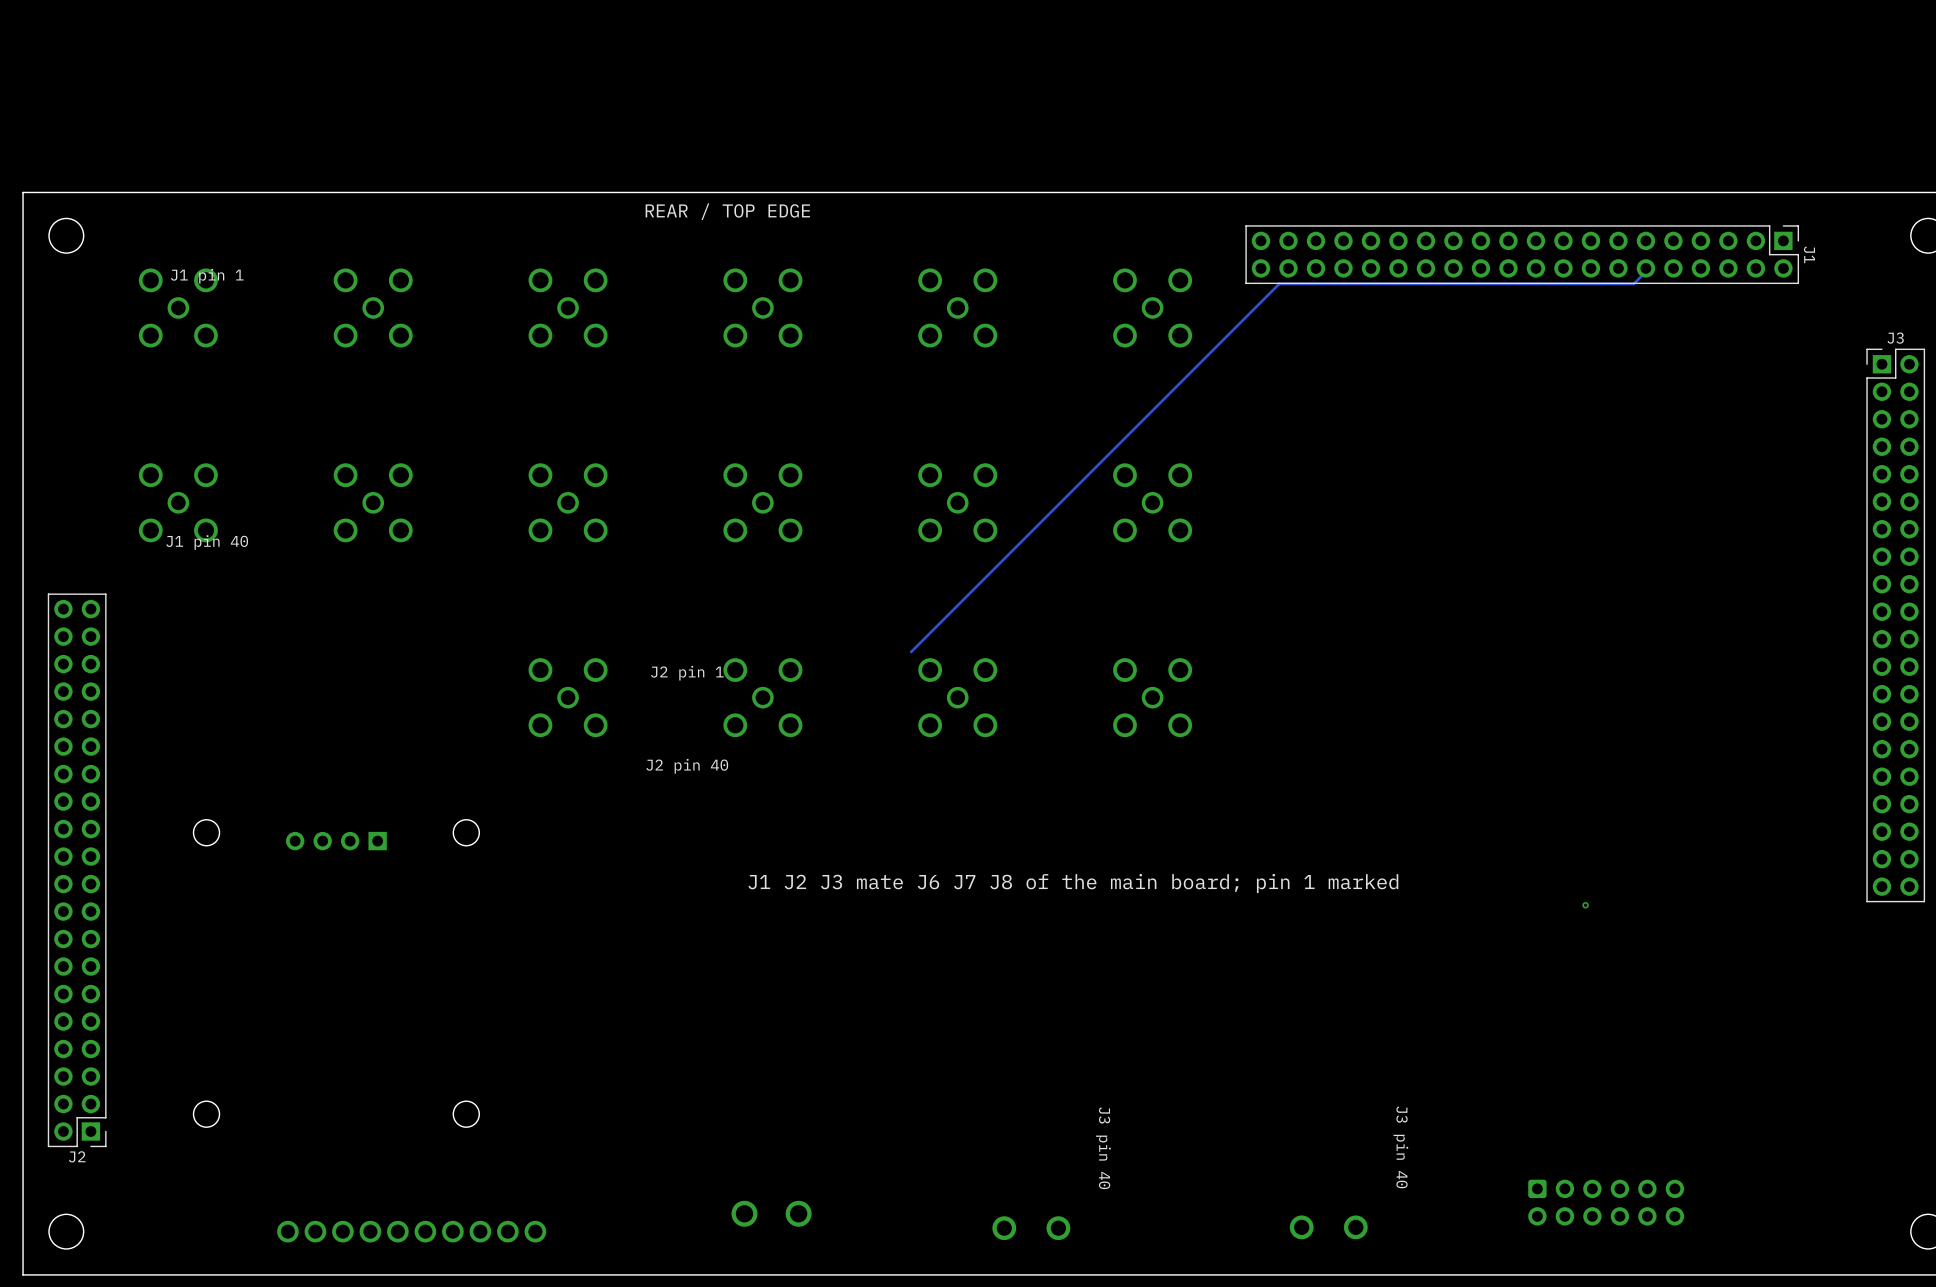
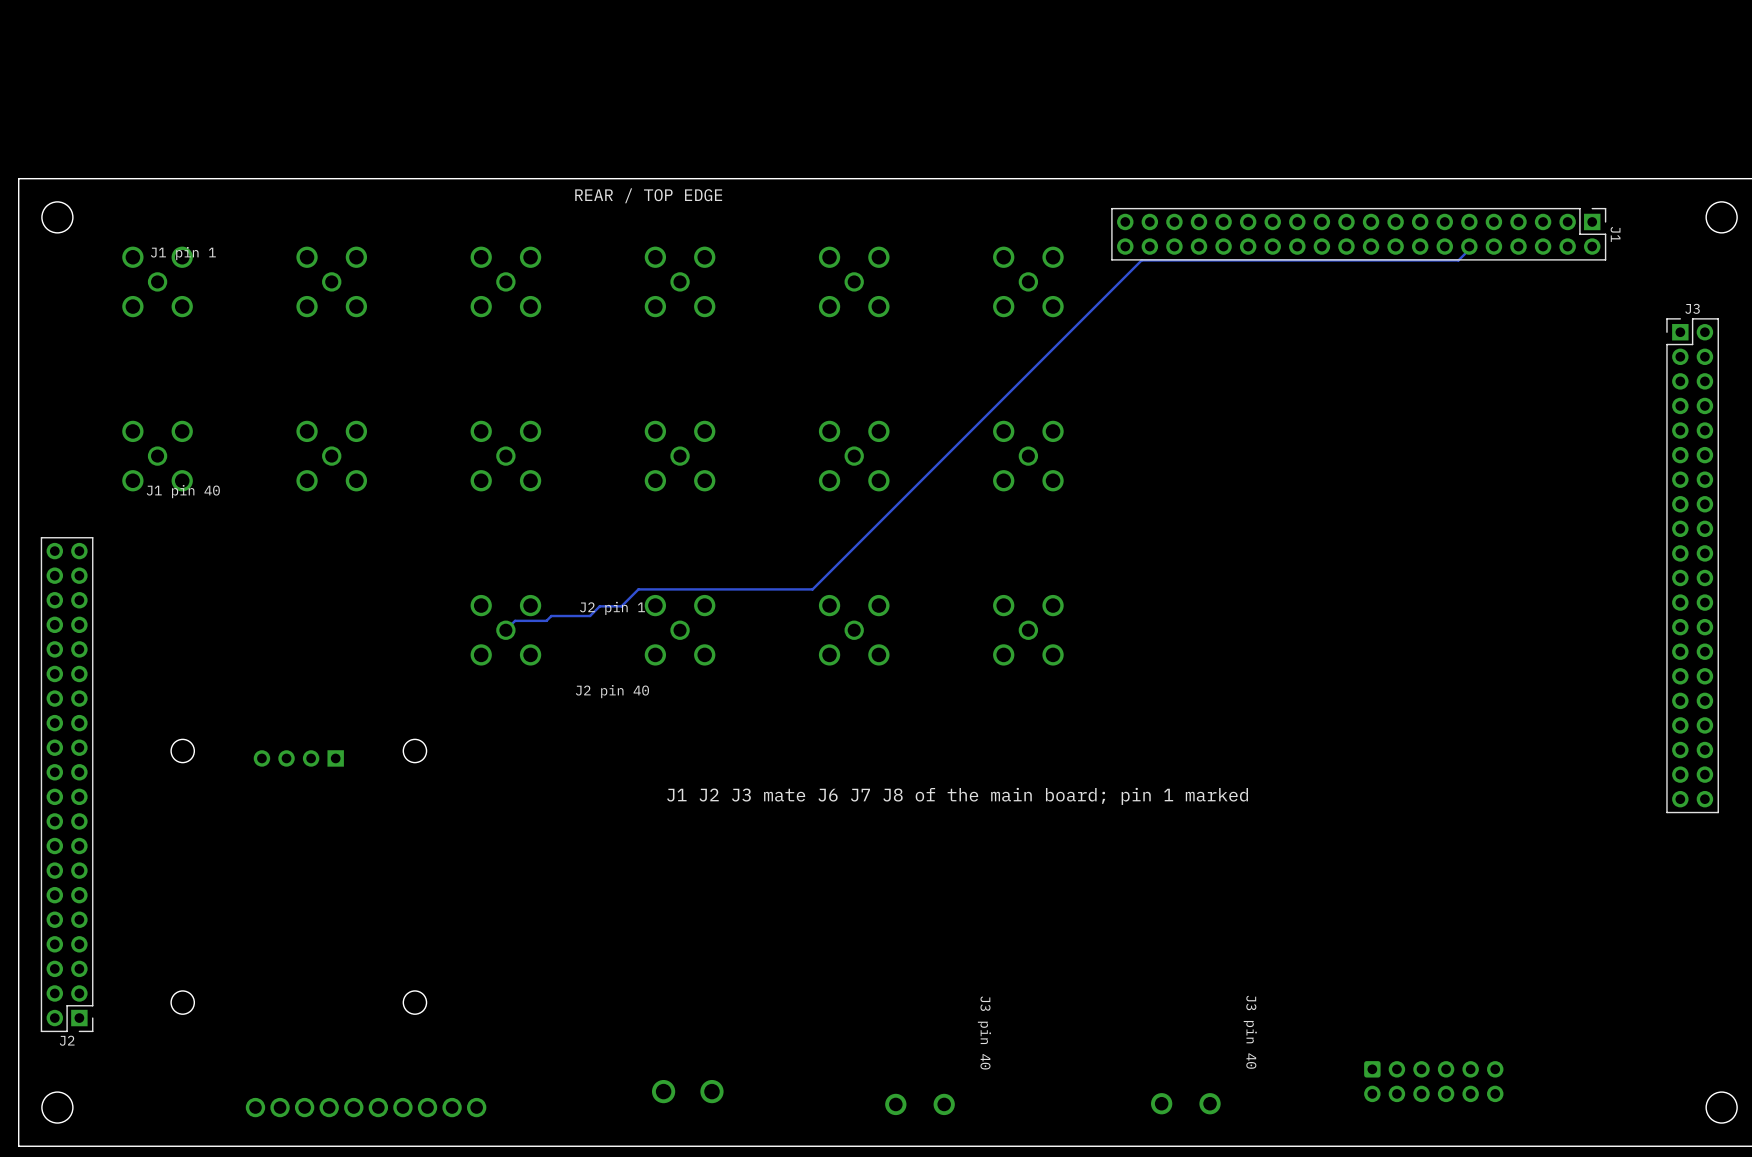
track: none -> (812, 589) (638, 589) (621, 606) (599, 606) (590, 616) (551, 616) (546, 620) (515, 620) (505, 630)
via: (1585, 905) -> none

